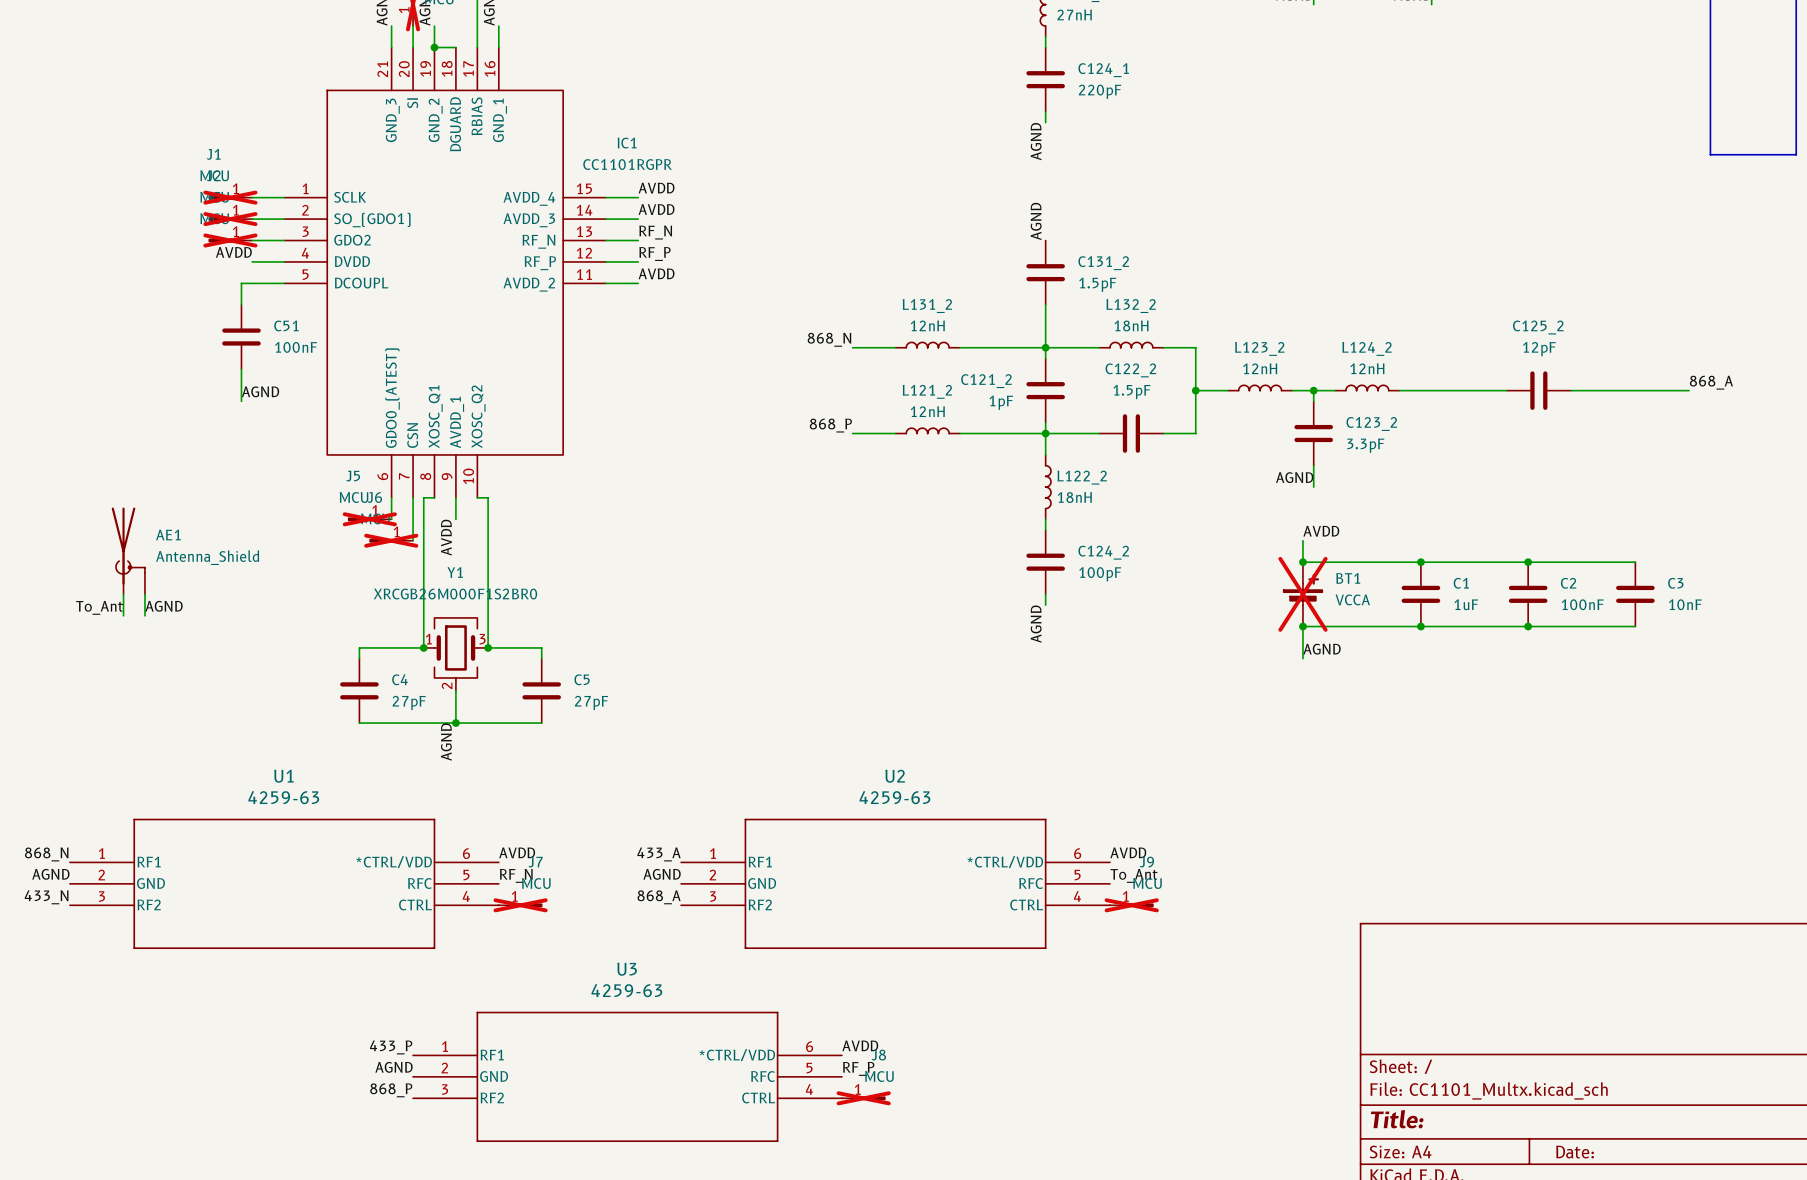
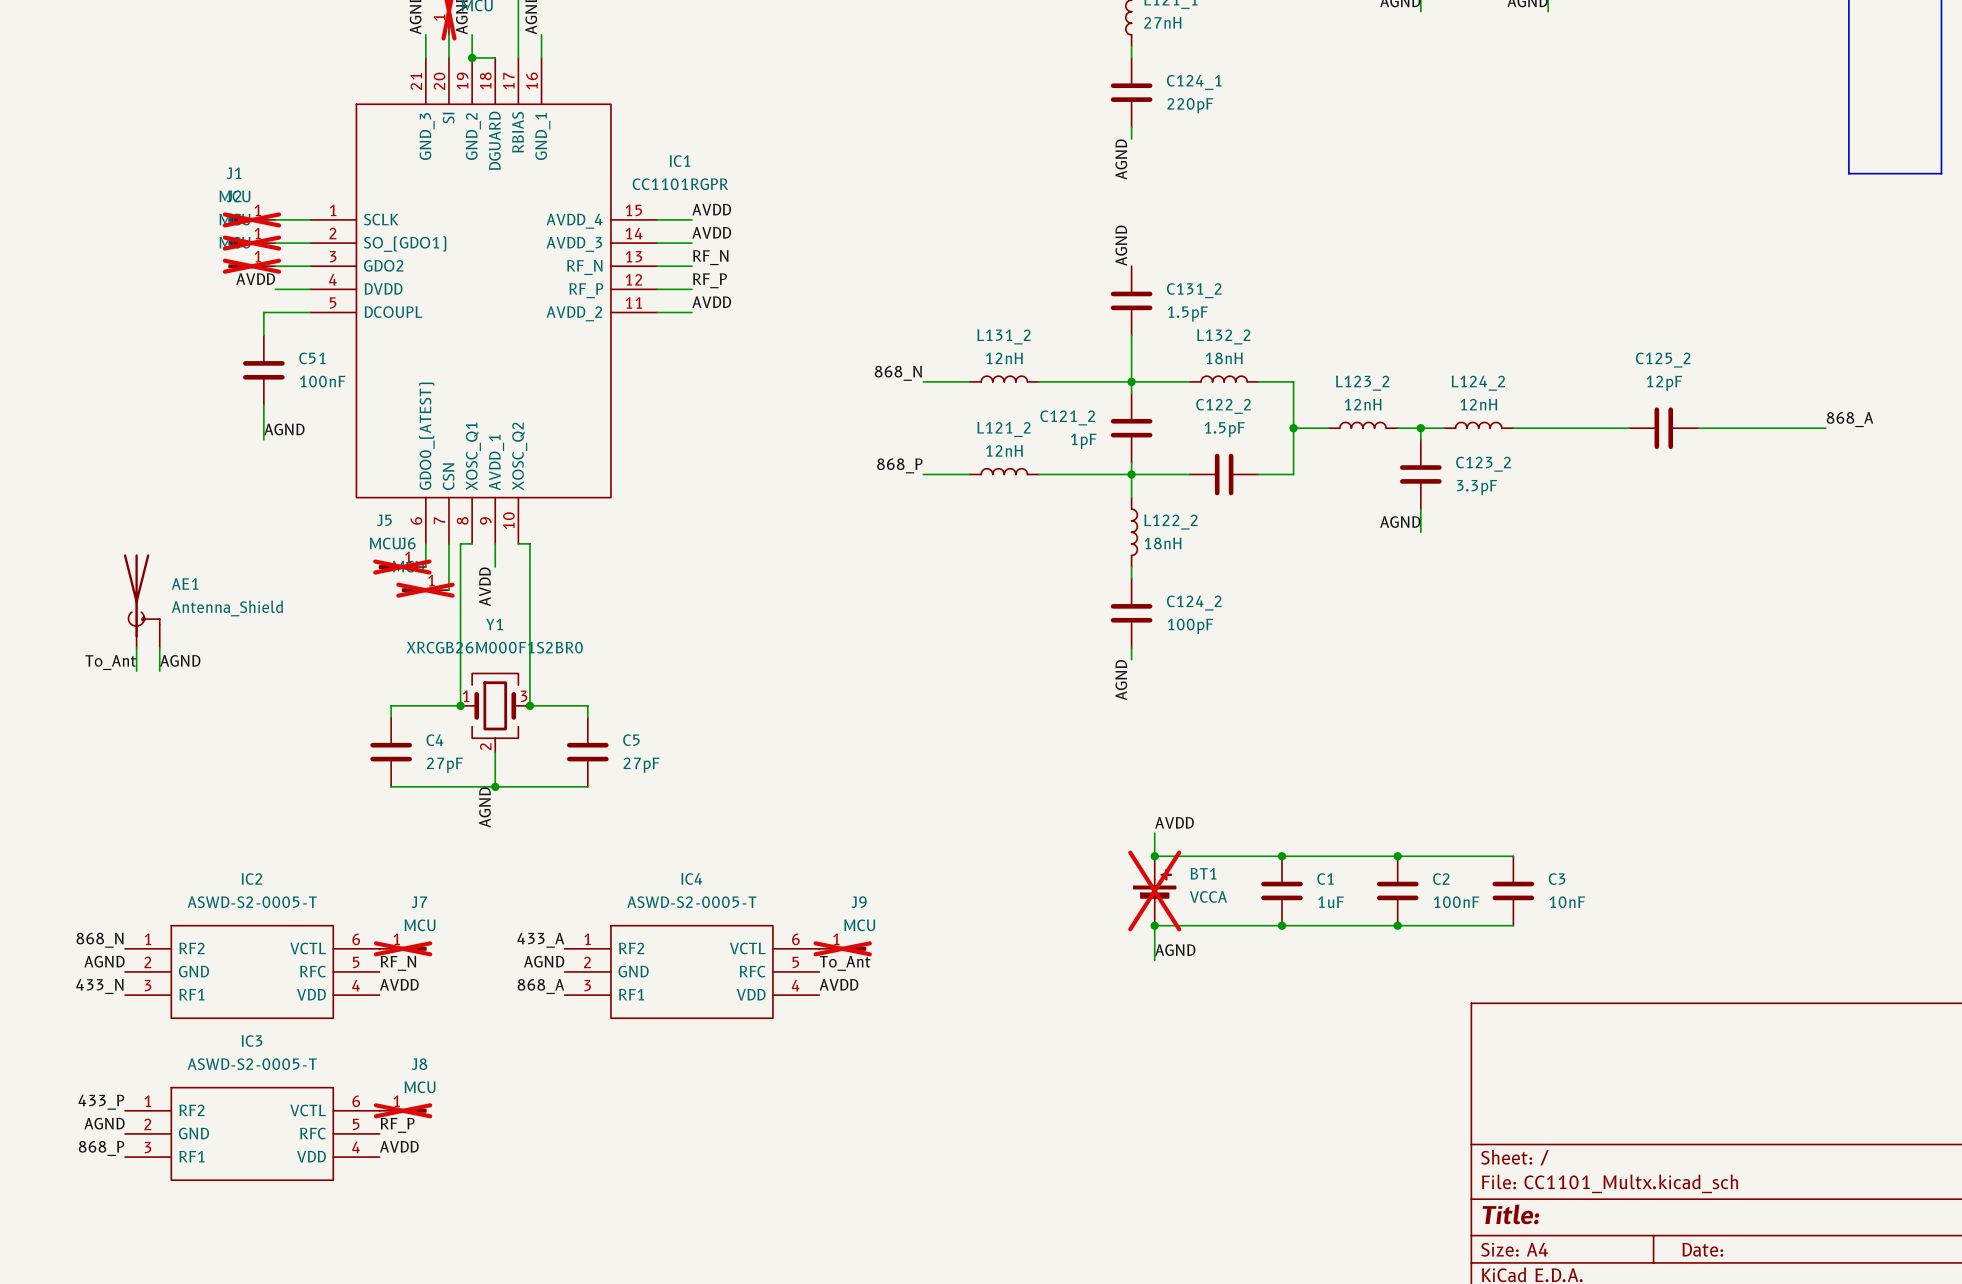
label: AVDD (1321, 531) -> none
wire: (1302, 540) (1302, 562) (1635, 562) -> none
junction: (1302, 562) -> none
junction: (1420, 562) -> none
junction: (1528, 562) -> none
BT1 position: (1302, 594) -> (1154, 890)
C1 position: (1420, 594) -> (1281, 890)
C2 position: (1528, 594) -> (1397, 890)
C3 position: (1635, 594) -> (1513, 890)
junction: (1302, 626) -> none
junction: (1420, 626) -> none
junction: (1528, 626) -> none
wire: (1635, 626) (1302, 626) (1302, 658) -> none
label: AGND (1322, 649) -> none
wire: none -> (1154, 833) (1154, 856) (1513, 856)
junction: none -> (1154, 856)
junction: none -> (1281, 856)
junction: none -> (1397, 856)
junction: none -> (1154, 925)
junction: none -> (1281, 925)
junction: none -> (1397, 925)
wire: none -> (1513, 925) (1154, 925) (1154, 960)
label: AVDD (517, 852) -> none
label position: AVDD (1128, 852) -> AVDD (1174, 822)
label position: 868_N (46, 854) -> 868_N (100, 940)
label position: 433_A (658, 854) -> 433_A (540, 940)
label position: AGND (50, 874) -> AGND (104, 961)
label: AGND (662, 874) -> none
label: none -> AGND (1175, 950)
label position: RF_N (516, 875) -> RF_N (398, 963)
label: To_Ant (1133, 875) -> none
U1: 4259-63 (284, 883) -> none
U2: 4259-63 (895, 883) -> none
label: none -> AGND (544, 961)
label: none -> To_Ant (845, 963)
IC2: none -> ASWD-S2-0005-T (252, 971)
IC4: none -> ASWD-S2-0005-T (691, 971)
label position: 433_N (46, 897) -> 433_N (99, 986)
label position: 868_A (659, 897) -> 868_A (540, 986)
J7 position: (520, 905) -> (403, 948)
J9 position: (1131, 905) -> (842, 948)
label: none -> AVDD (399, 984)
label: none -> AVDD (839, 984)
label: none -> 433_P (101, 1102)
label: none -> AGND (104, 1123)
label: none -> RF_P (397, 1125)
IC3: none -> ASWD-S2-0005-T (252, 1133)
label: AVDD (860, 1045) -> none
label: 433_P (391, 1047) -> none
label: none -> AVDD (399, 1146)
label: none -> 868_P (101, 1148)
label: AGND (393, 1067) -> none
label: RF_P (858, 1068) -> none
U3: 4259-63 (627, 1076) -> none
label: 868_P (391, 1090) -> none
J8 position: (863, 1098) -> (403, 1110)

